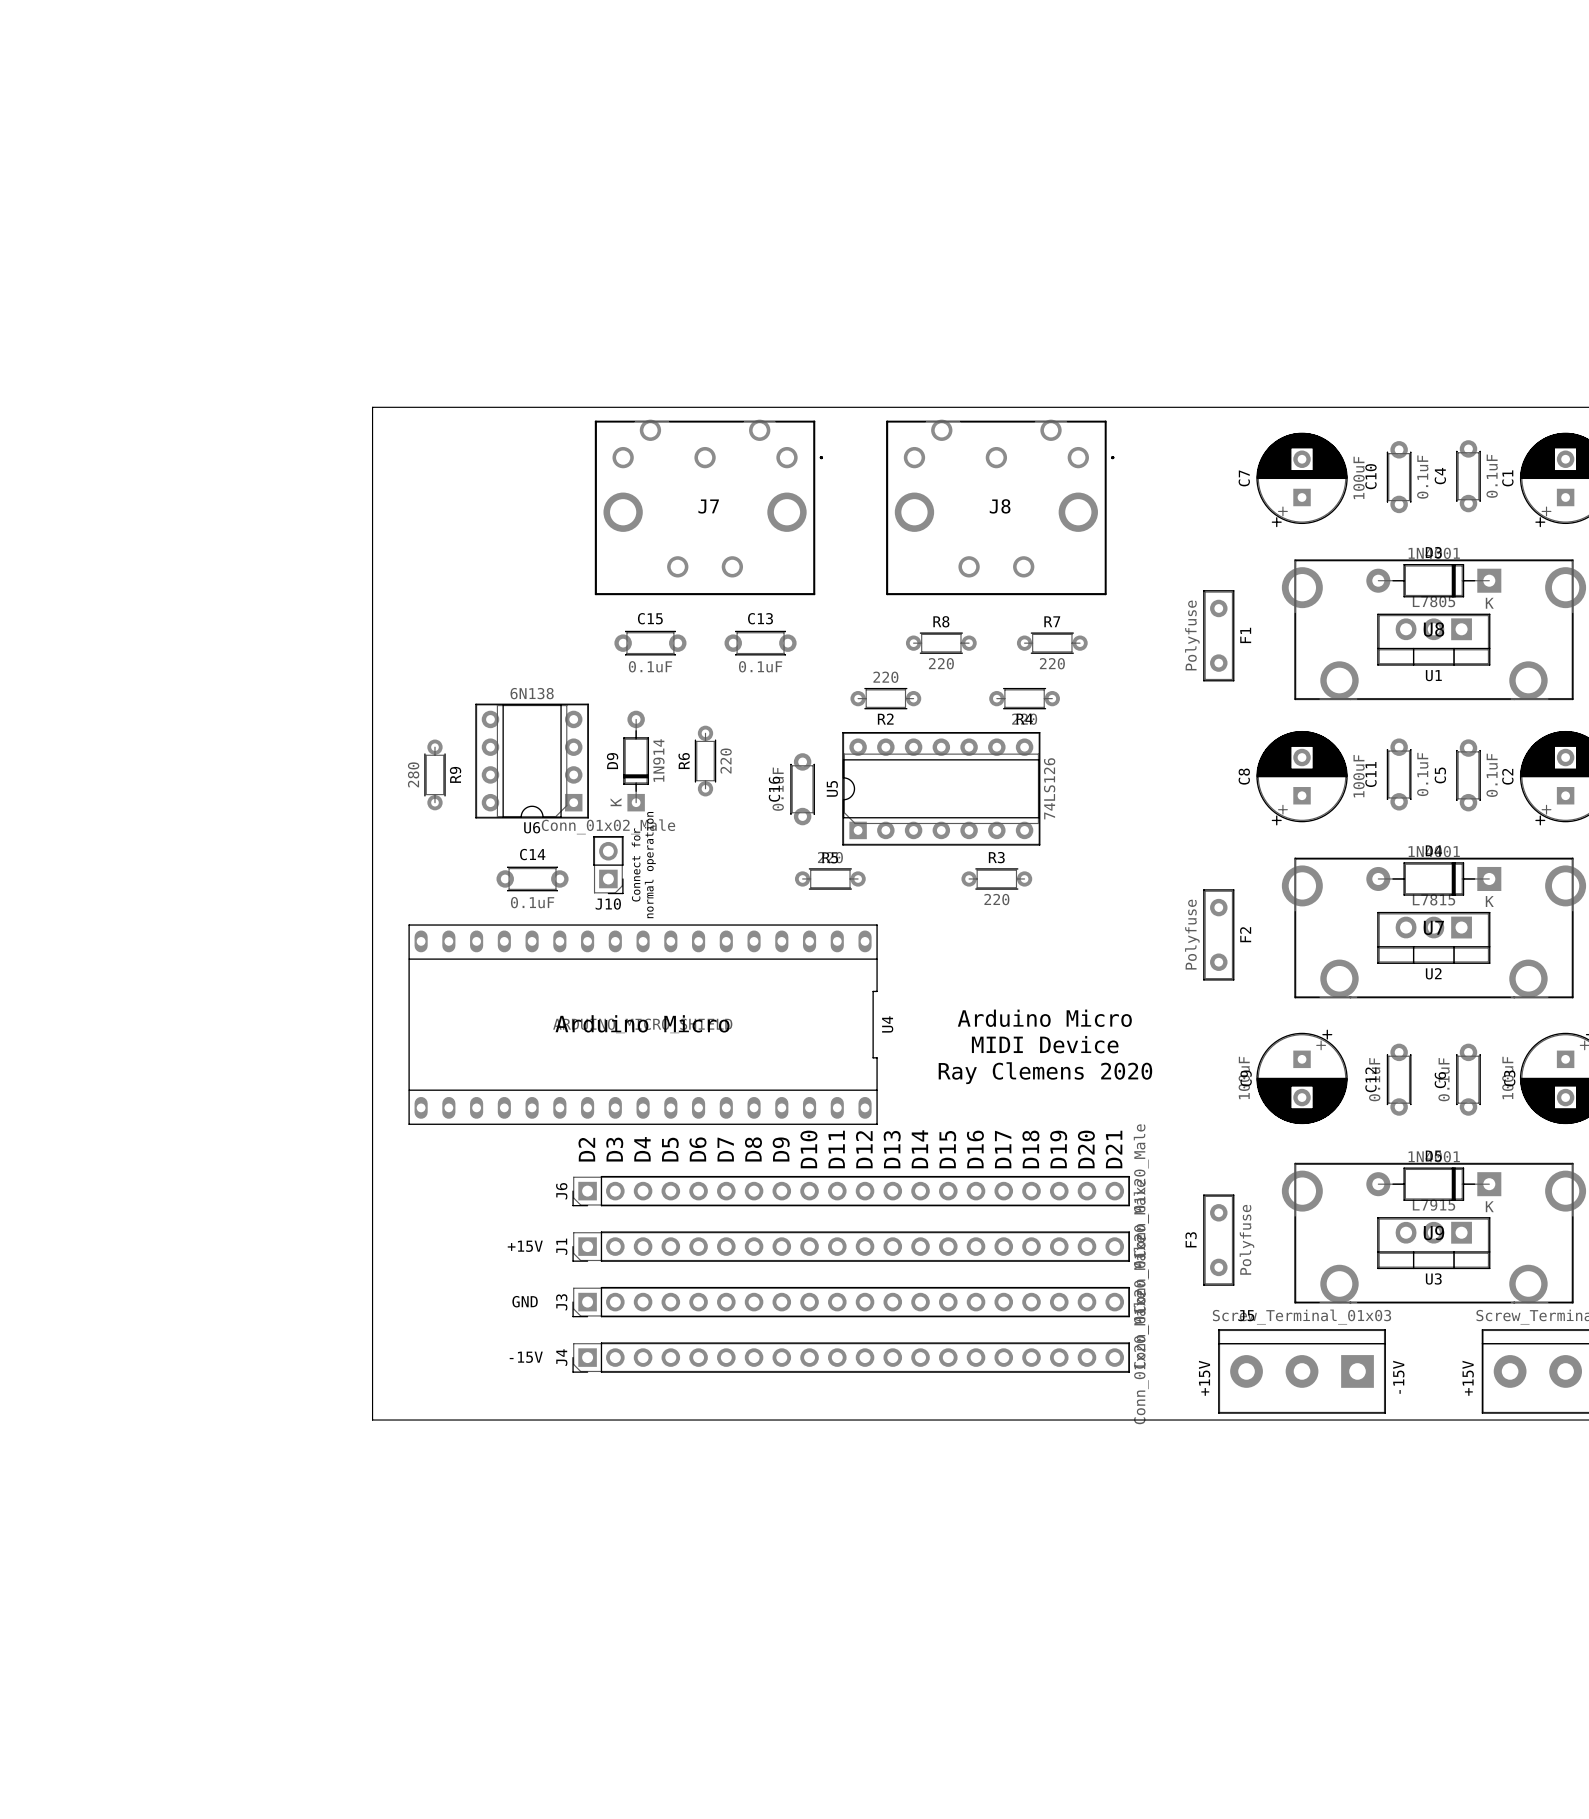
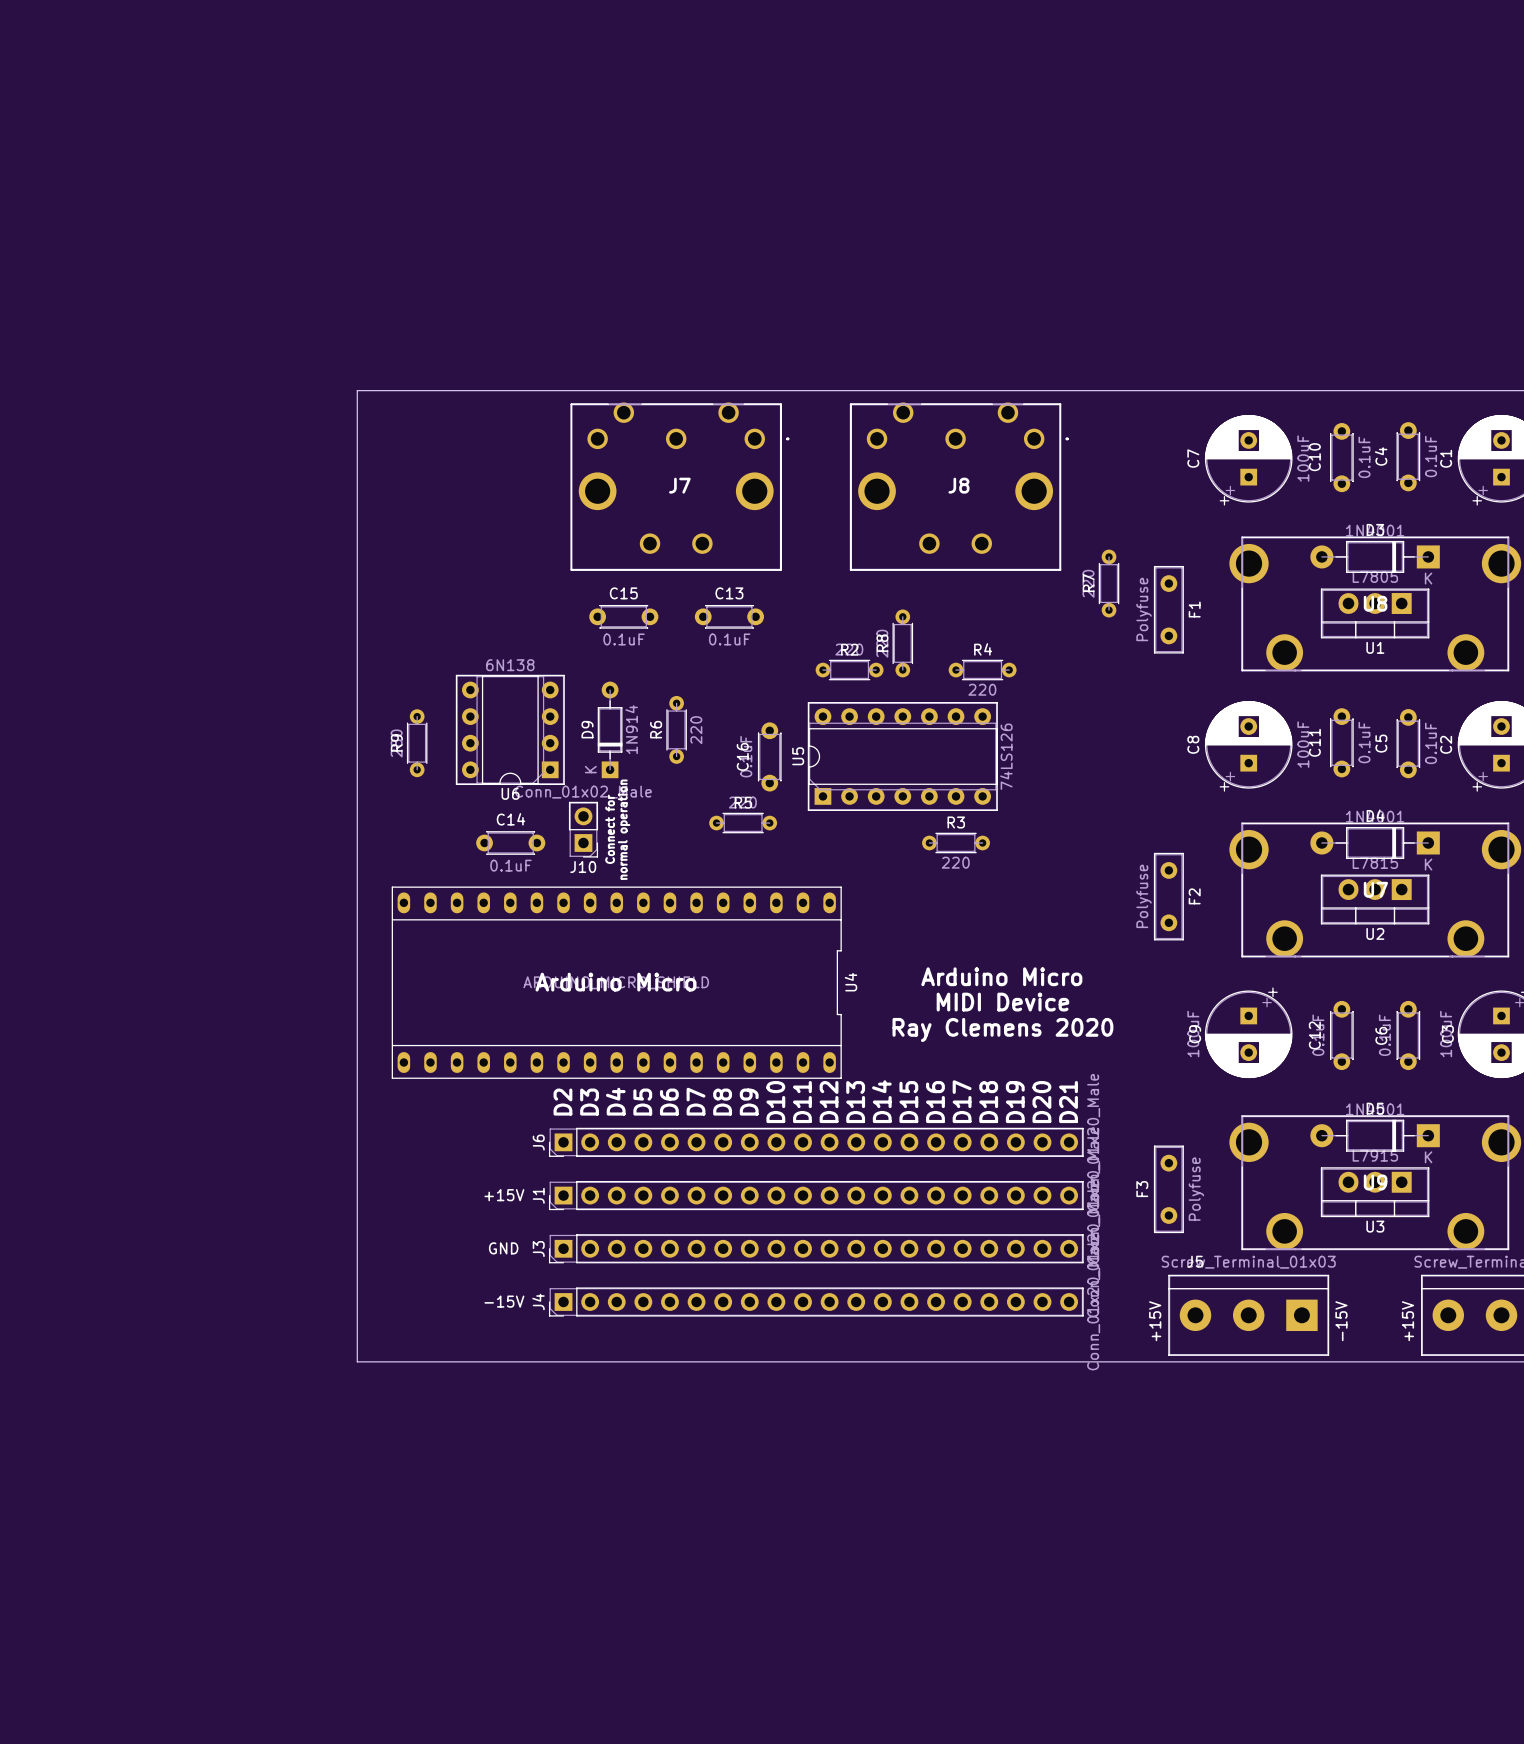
R8 name position: R8 (941, 621) -> R8 (882, 643)
R7 name position: R7 (1052, 621) -> R7 (1088, 583)
R8 rotation: 0° (941, 643) -> 90° clockwise (902, 643)
R7 rotation: 0° (1052, 643) -> 90° clockwise (1109, 583)
R7 position: (1052, 643) -> (1109, 583)
R2 name position: R2 (885, 719) -> R2 (849, 649)
R4 name position: R4 (1024, 719) -> R4 (983, 649)
R9 name position: R9 (455, 774) -> R9 (396, 742)
R5 position: (830, 878) -> (743, 823)

